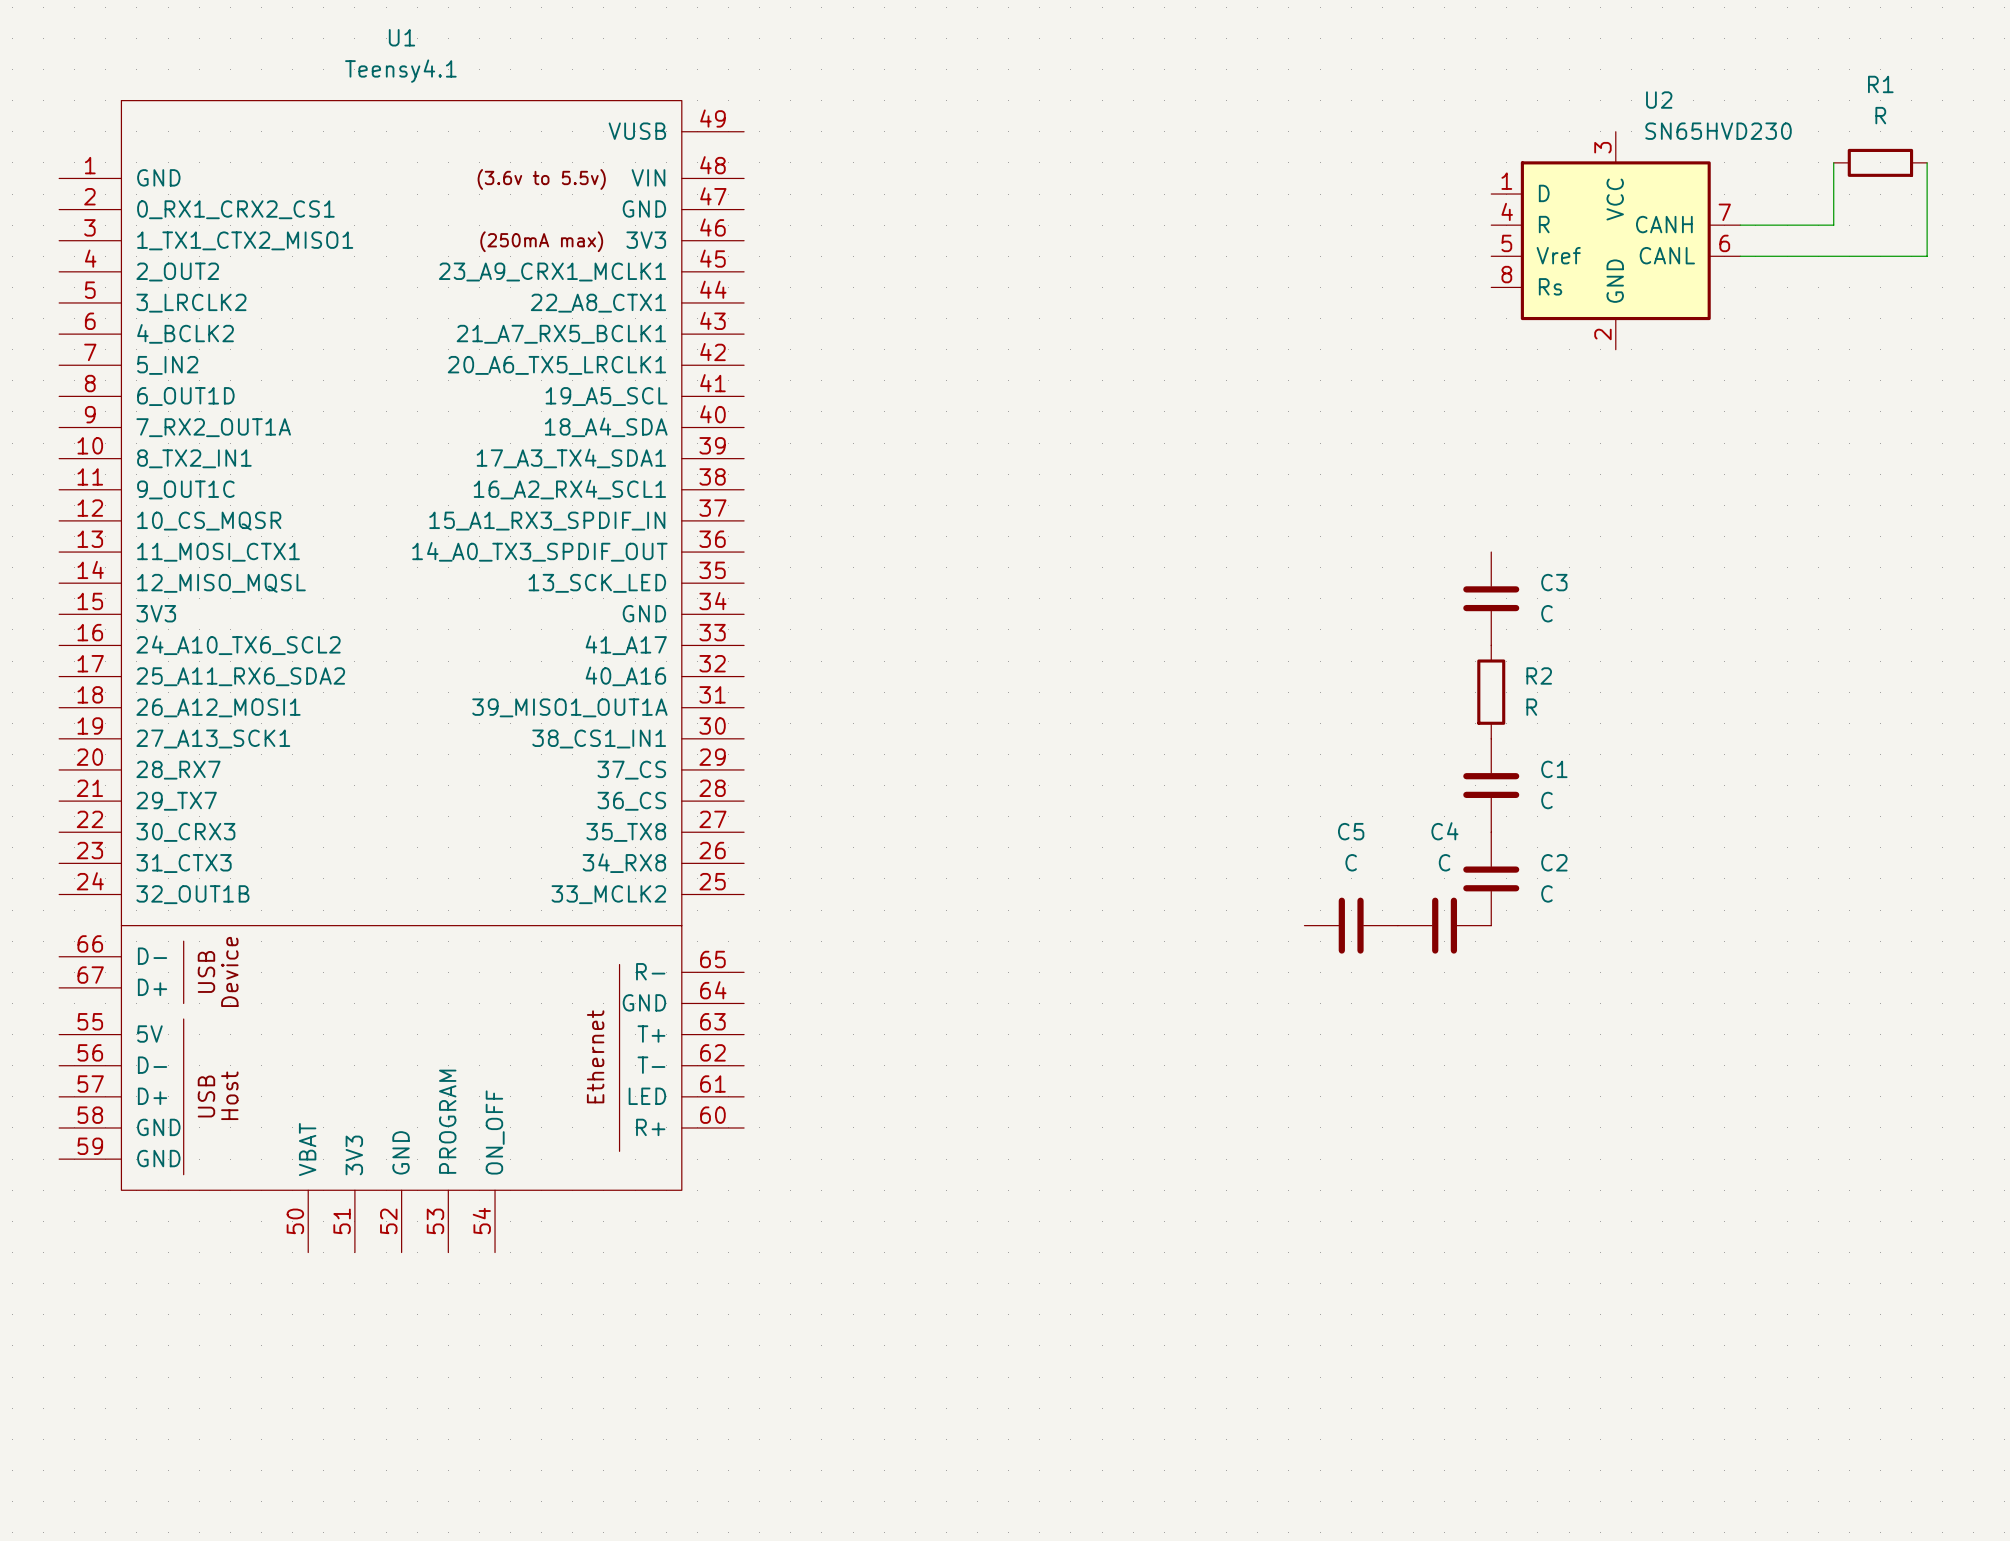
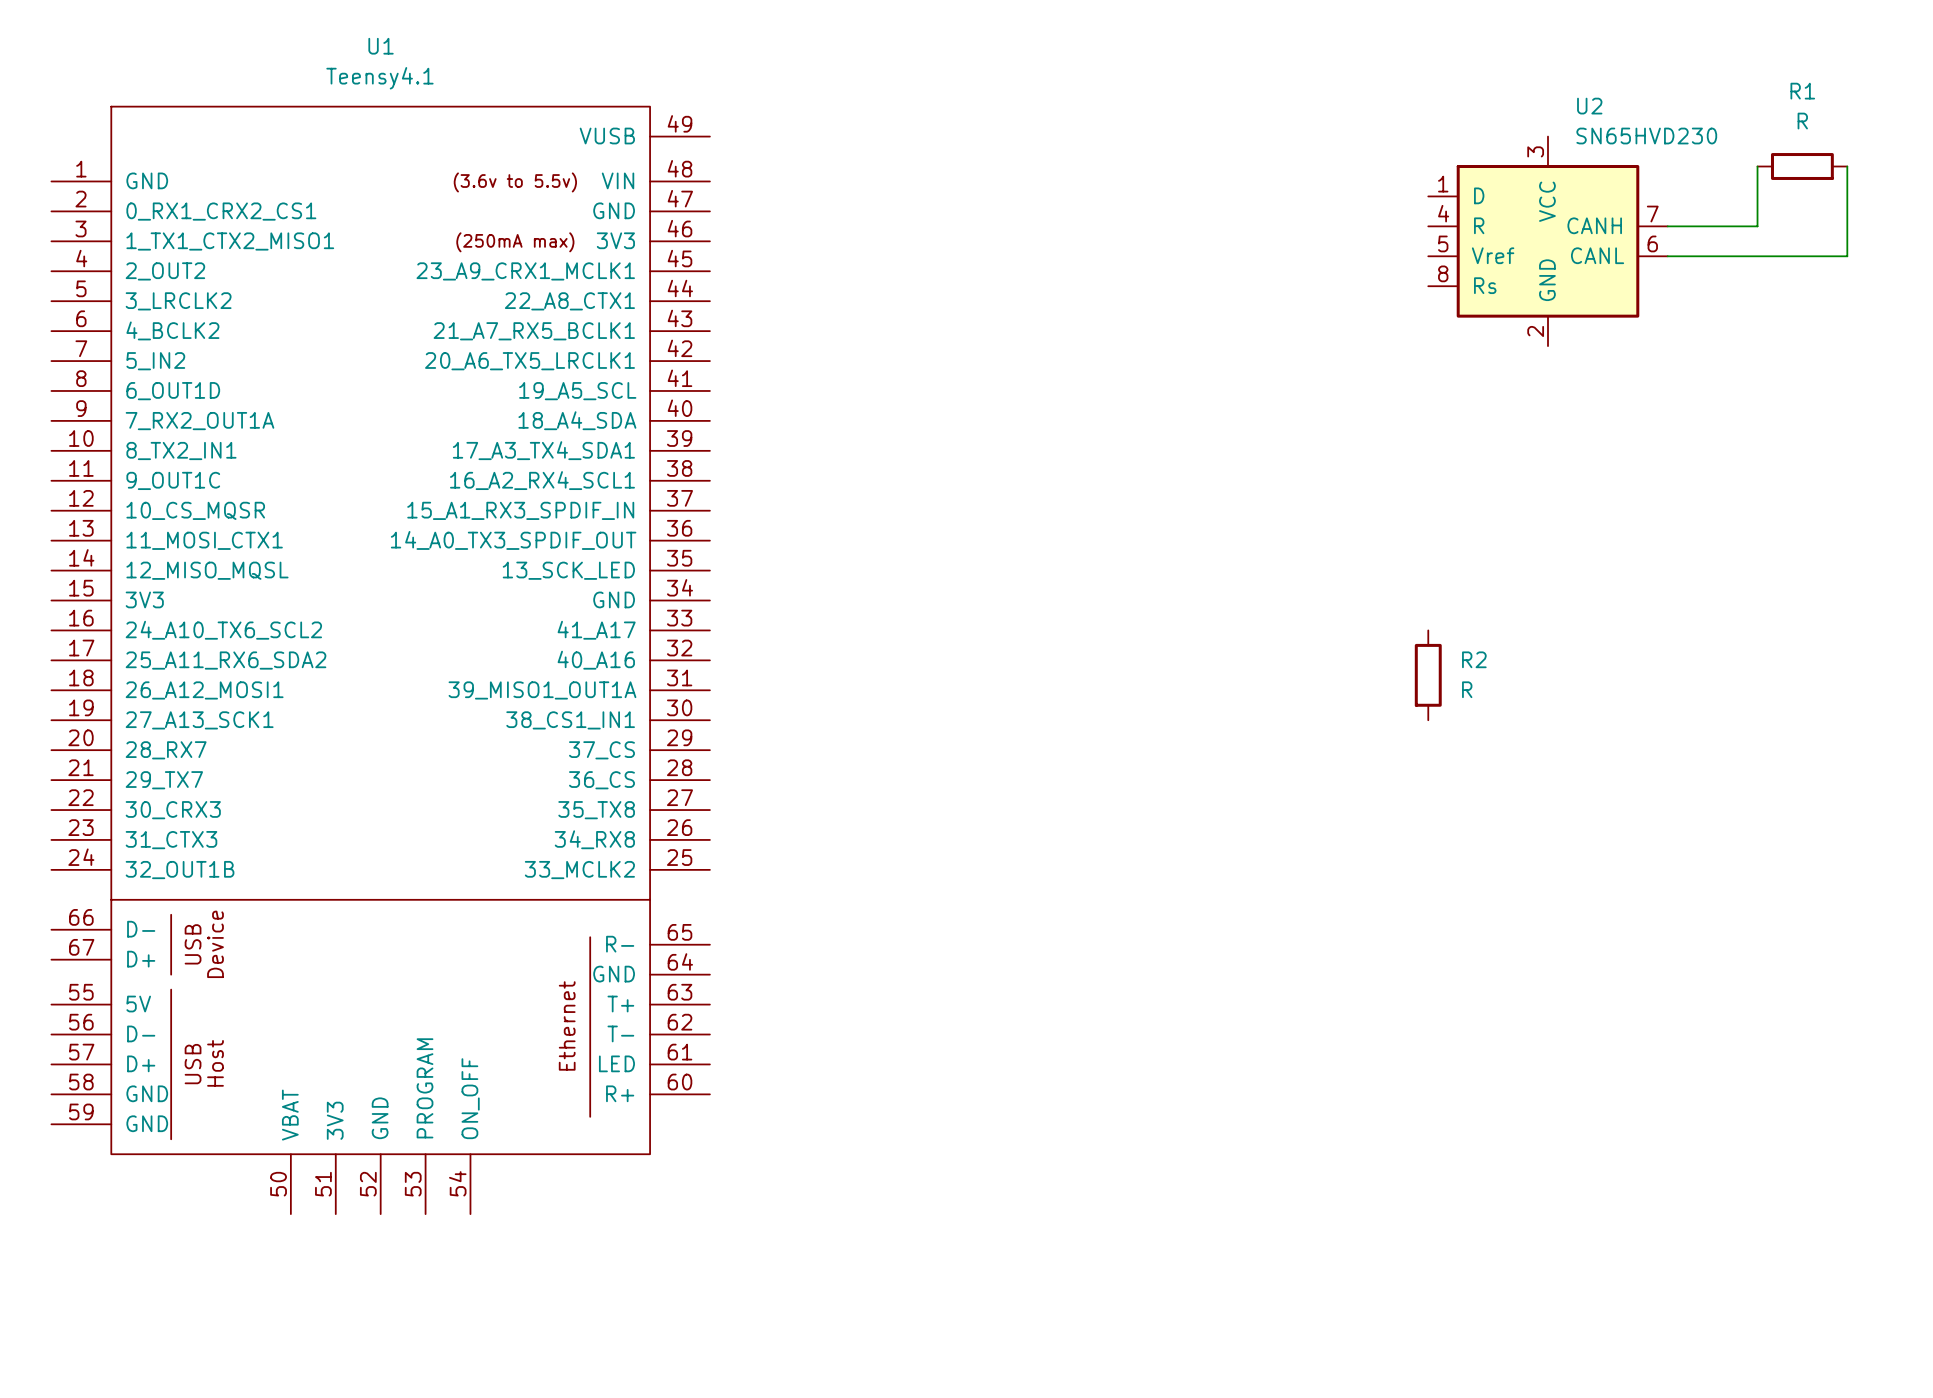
C3: C (1491, 598) -> none
C1: C (1491, 785) -> none
C2: C (1491, 878) -> none
C5: C (1351, 925) -> none
C4: C (1444, 925) -> none

